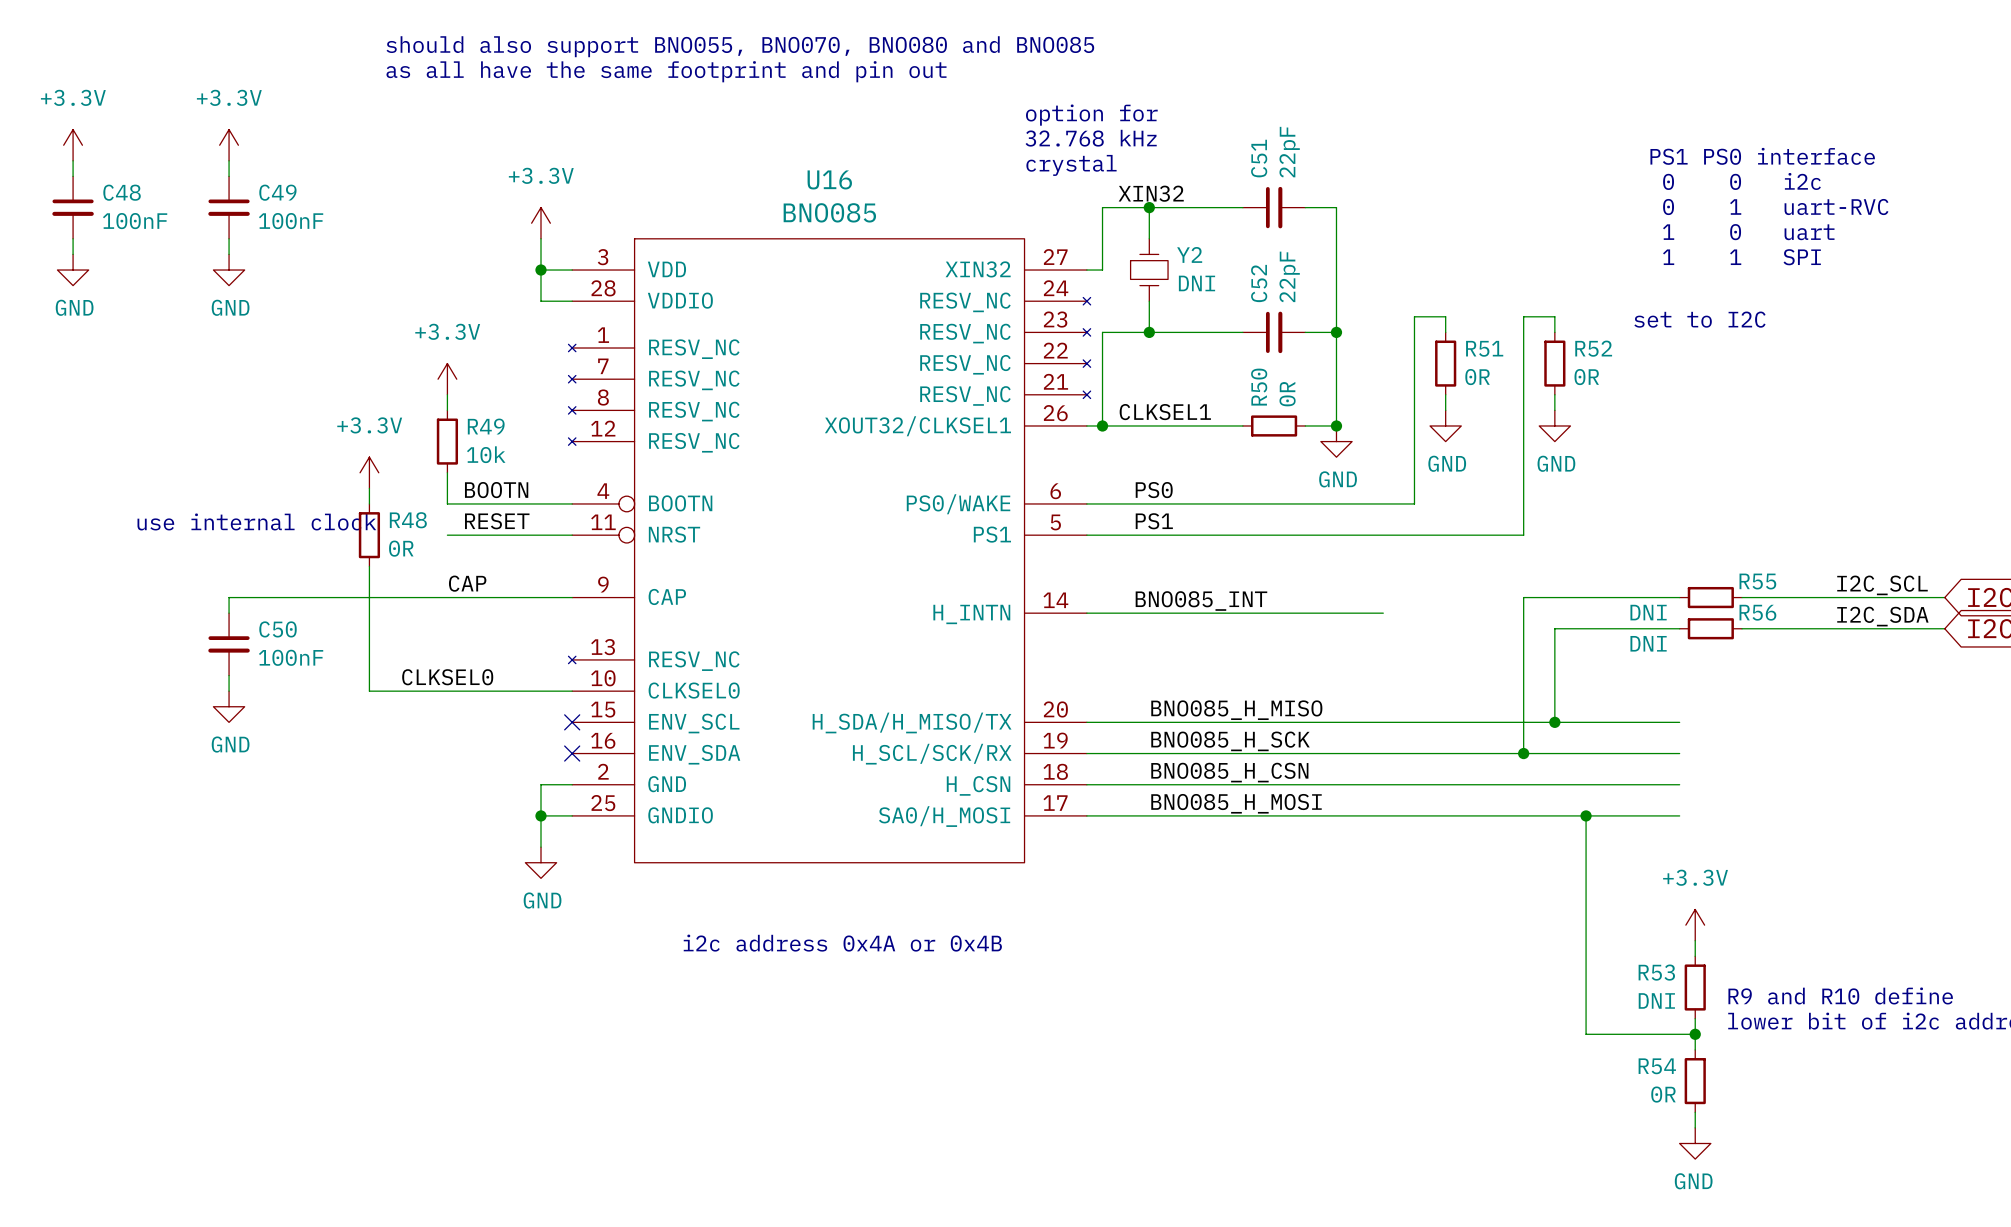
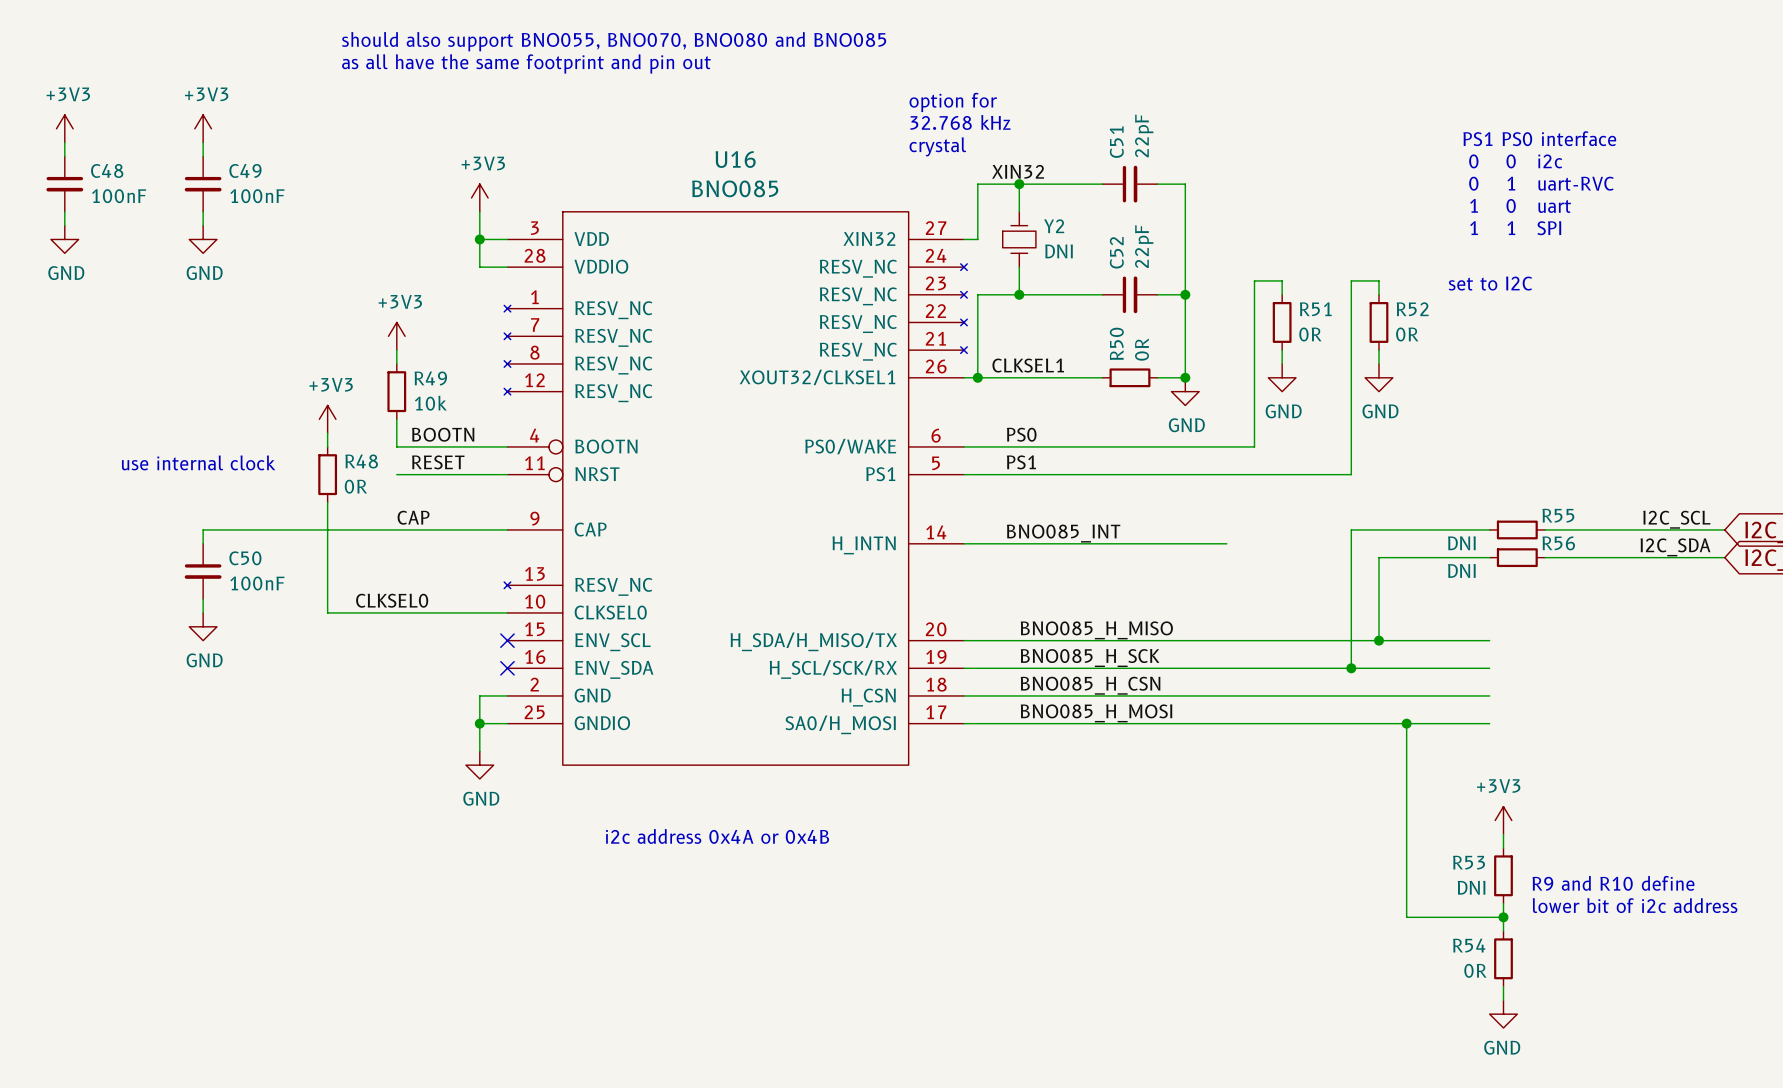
power symbol: +3.3V (73, 145) -> +3V3 (64, 128)
power symbol: +3.3V (229, 145) -> +3V3 (203, 128)
power symbol: +3.3V (540, 223) -> +3V3 (479, 197)
power symbol: +3.3V (447, 379) -> +3V3 (396, 336)
power symbol: +3.3V (369, 472) -> +3V3 (327, 419)
power symbol: +3.3V (1695, 925) -> +3V3 (1503, 820)

